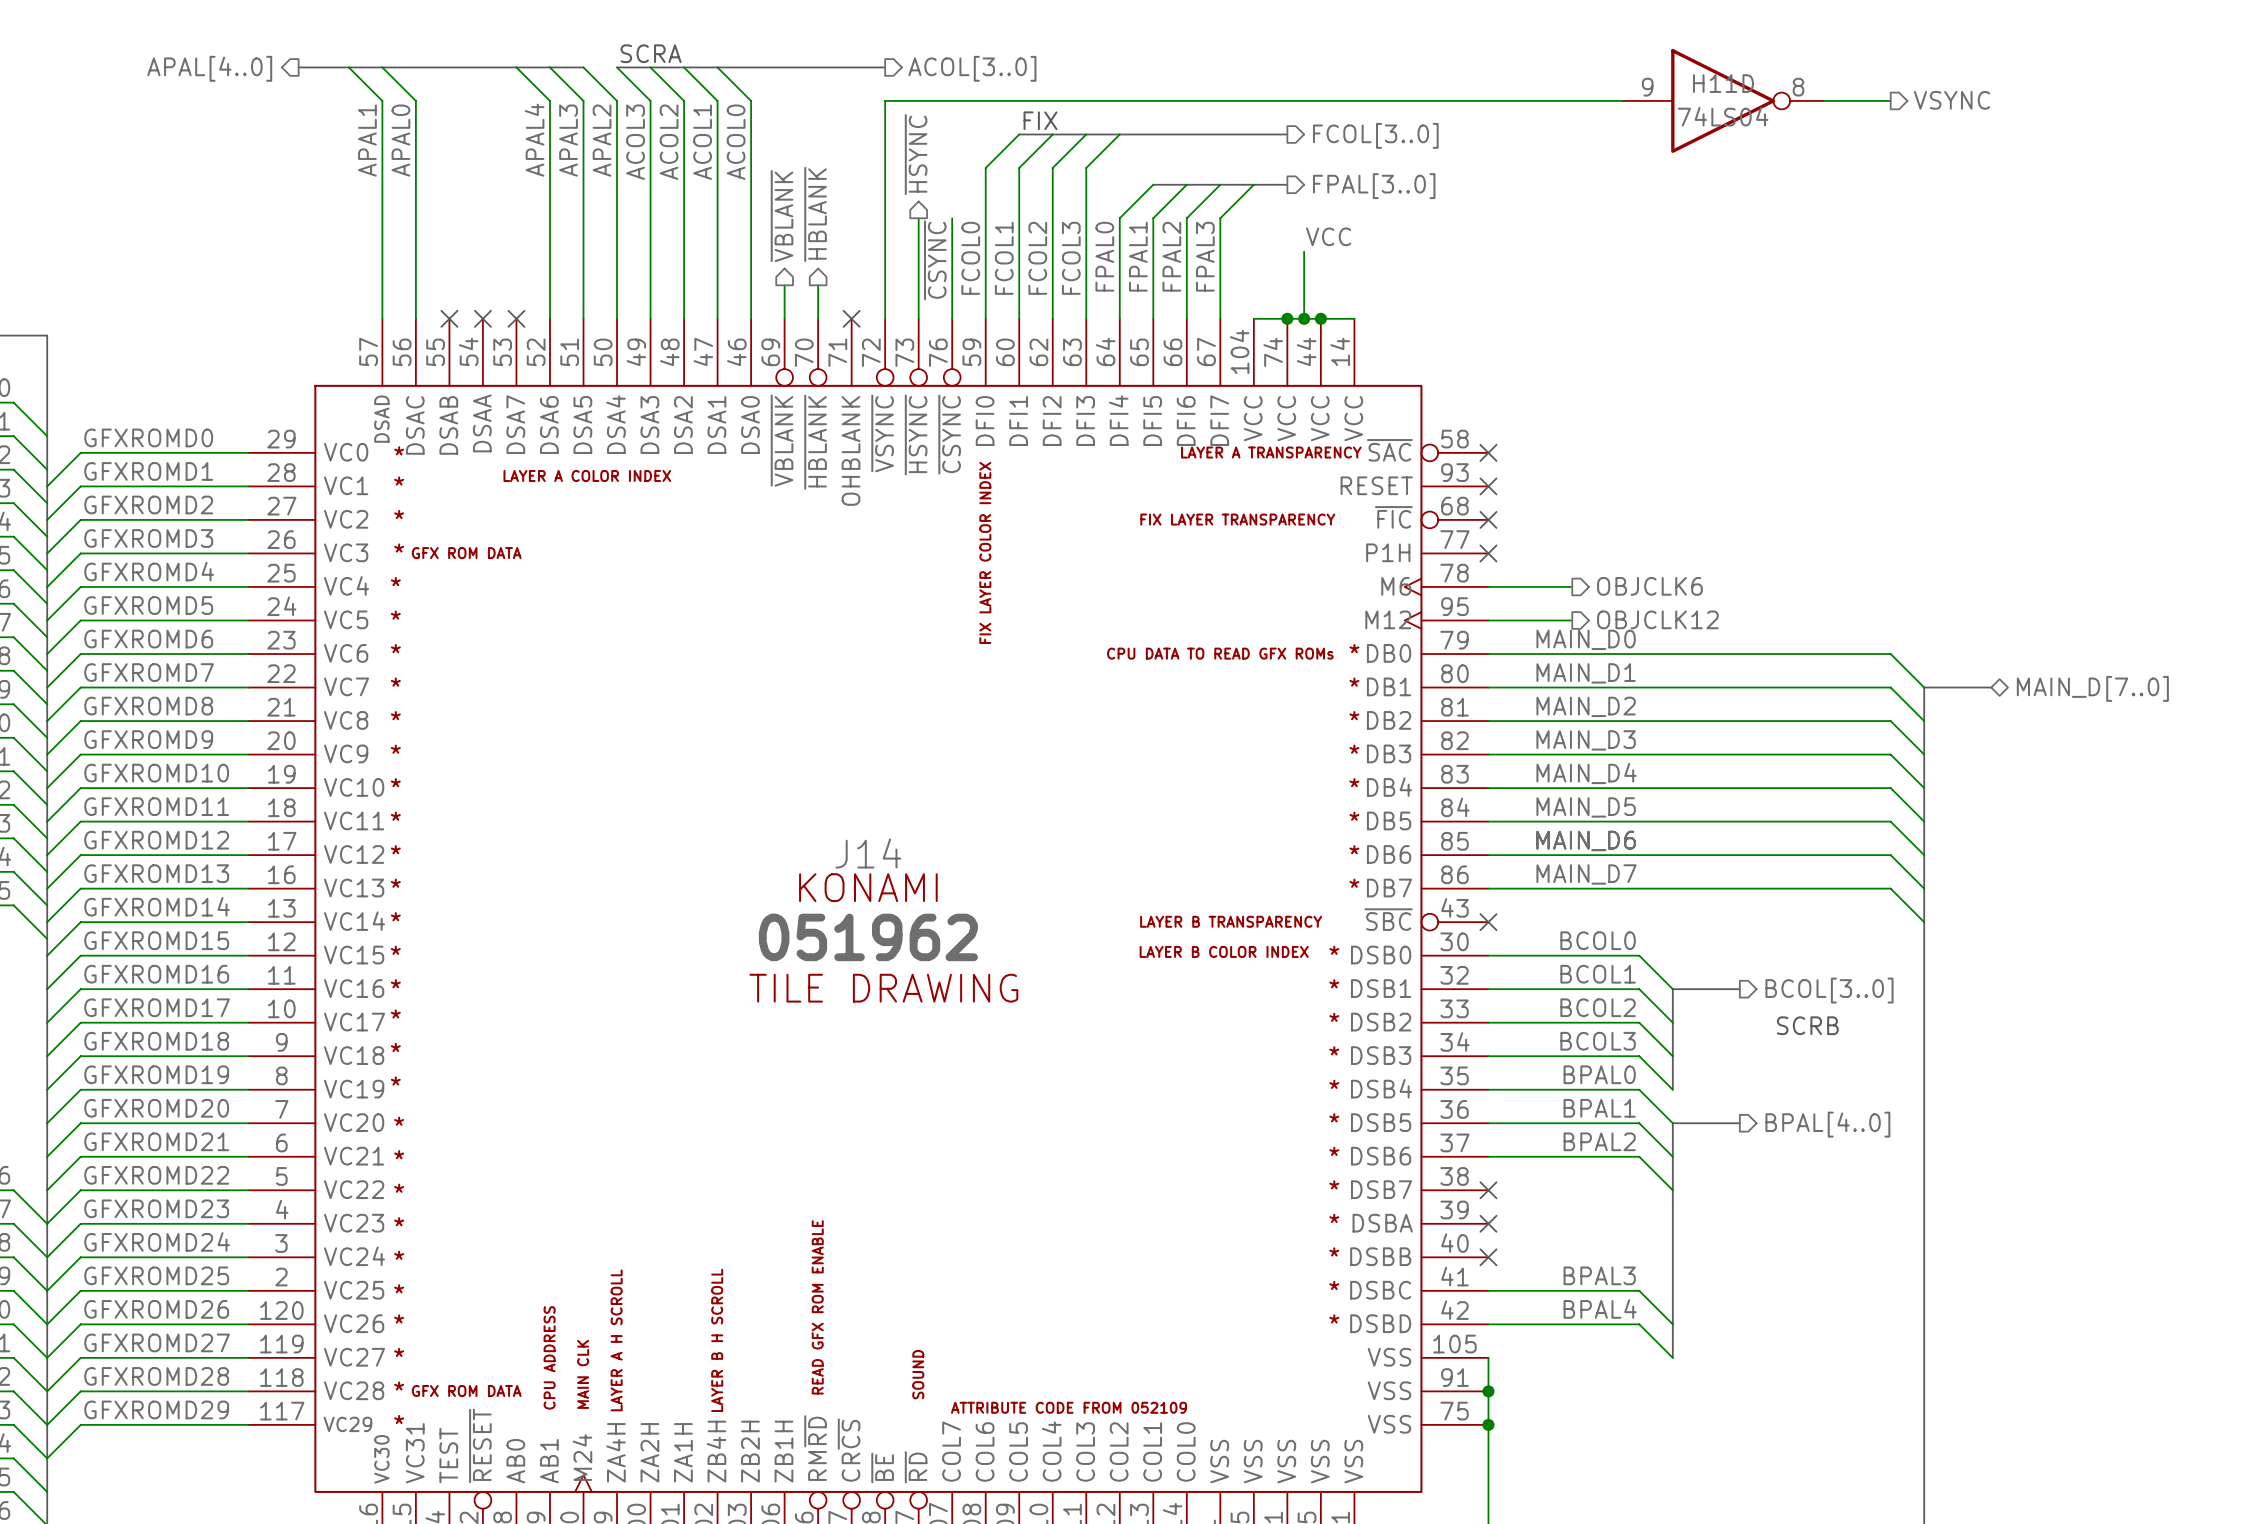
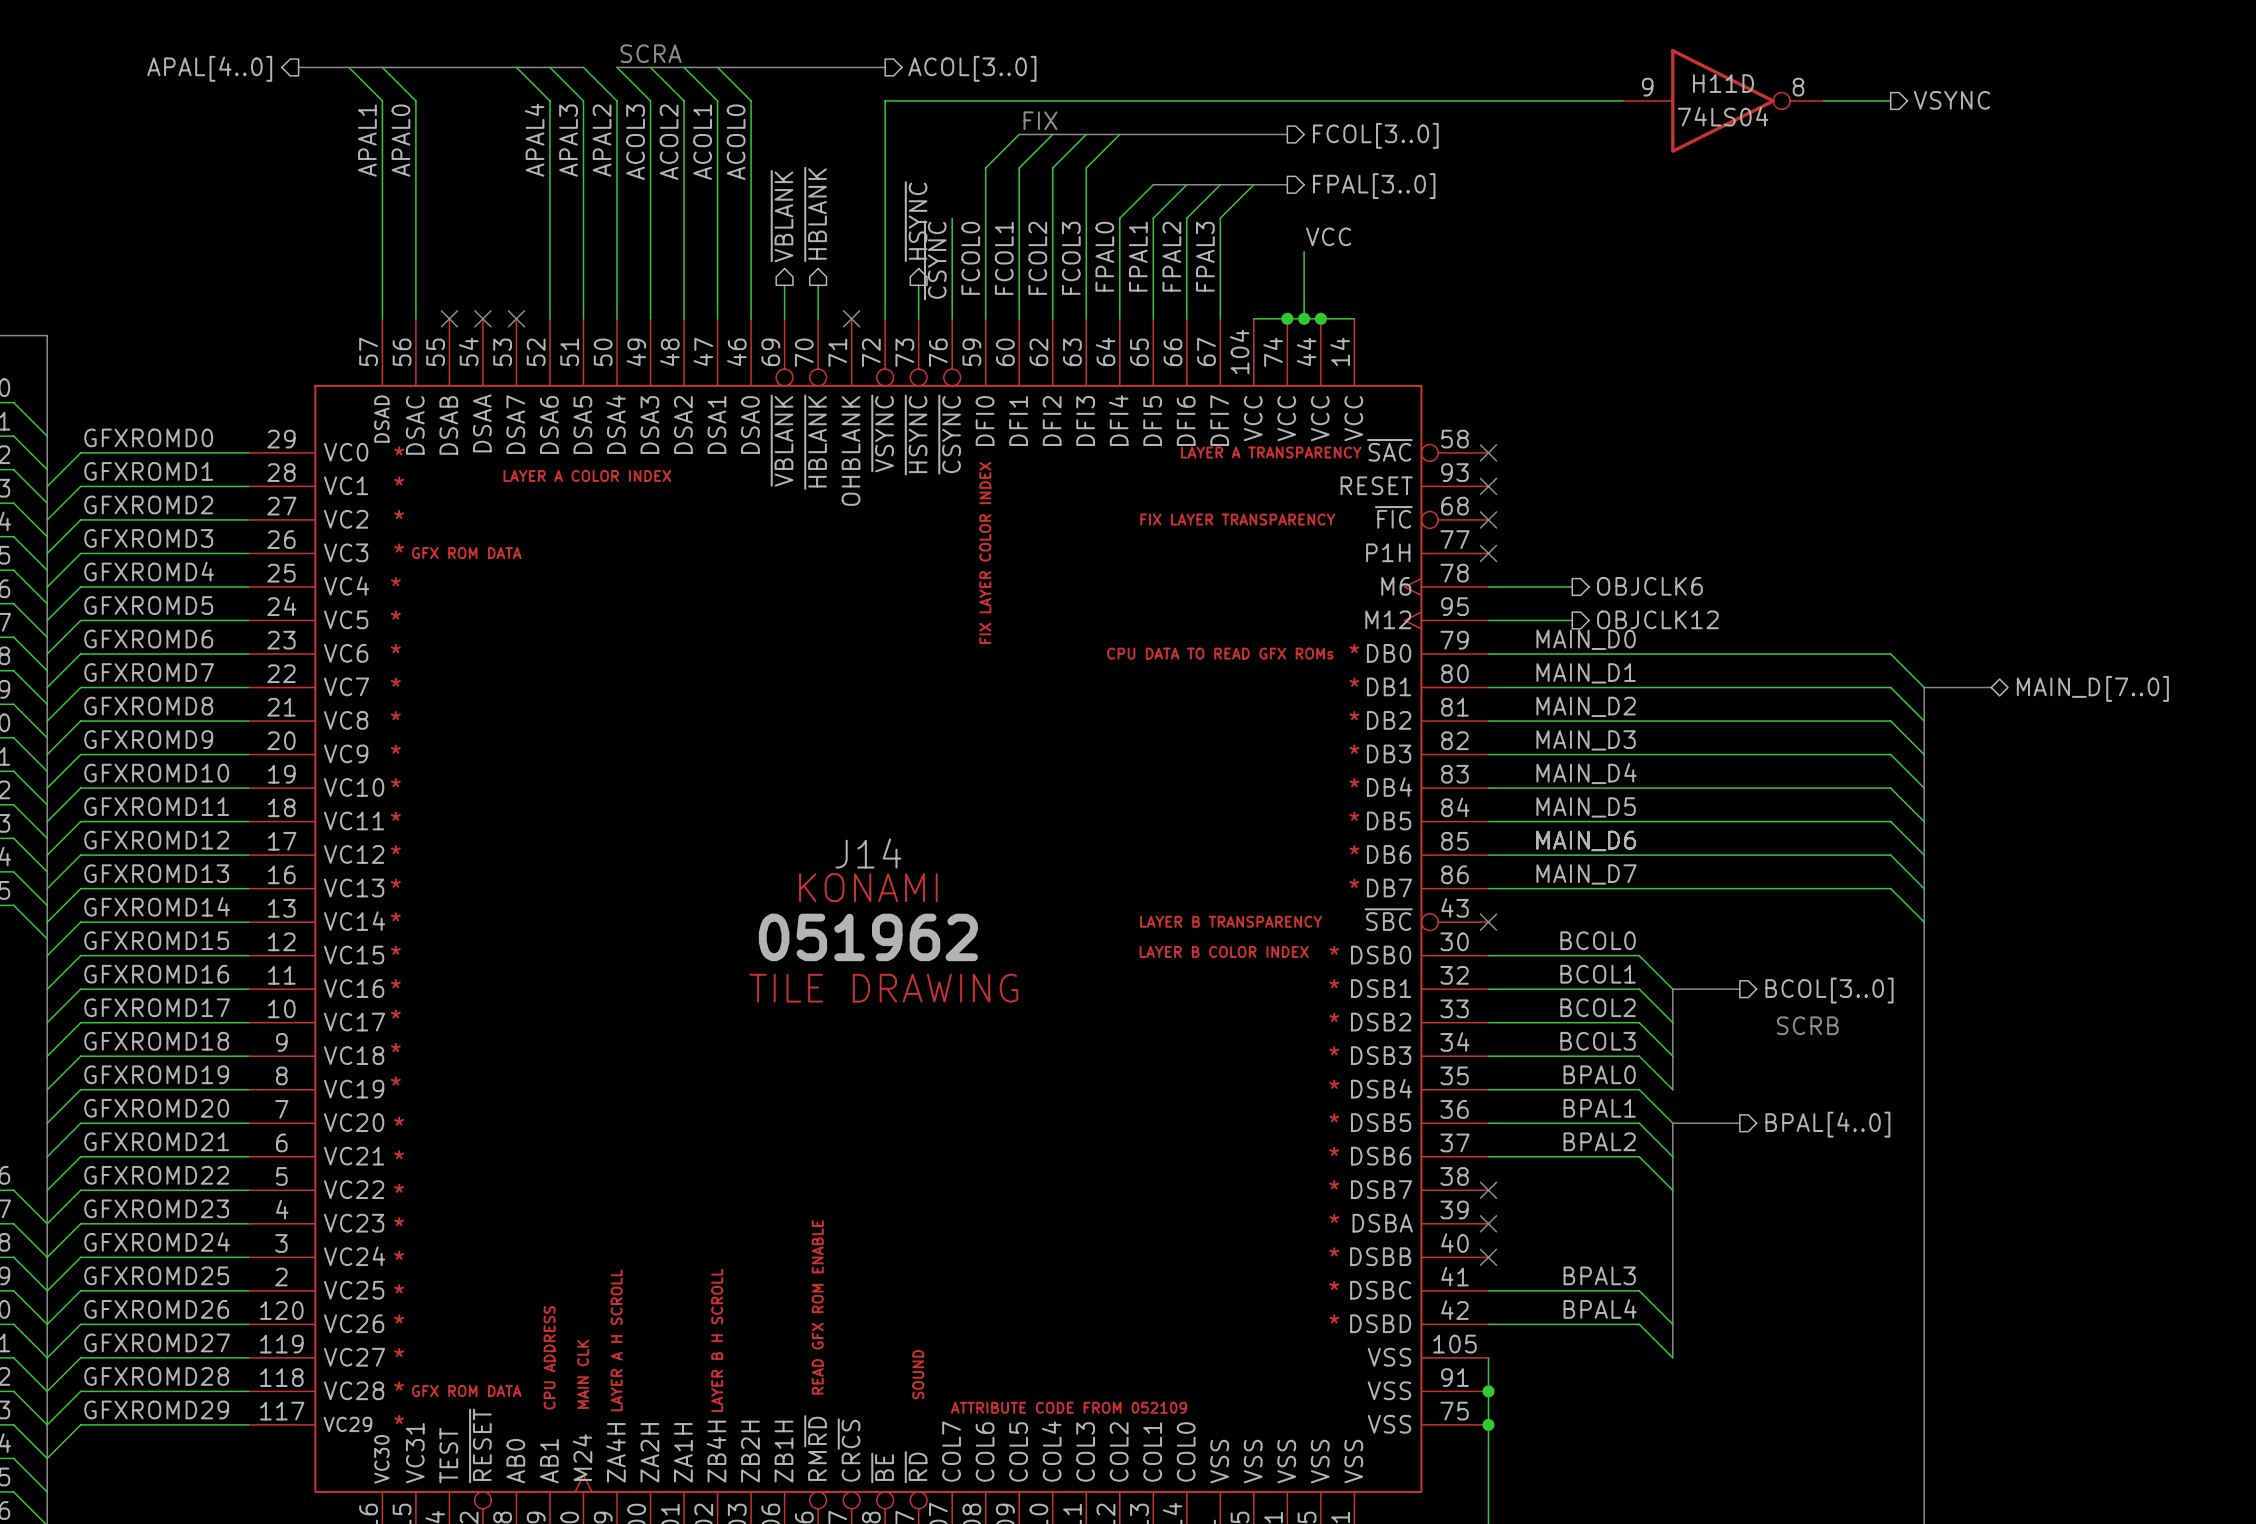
hierarchical label position: ~{HSYNC} (916, 154) -> ~{HSYNC} (916, 221)
wire: (918, 218) (918, 285) -> none

